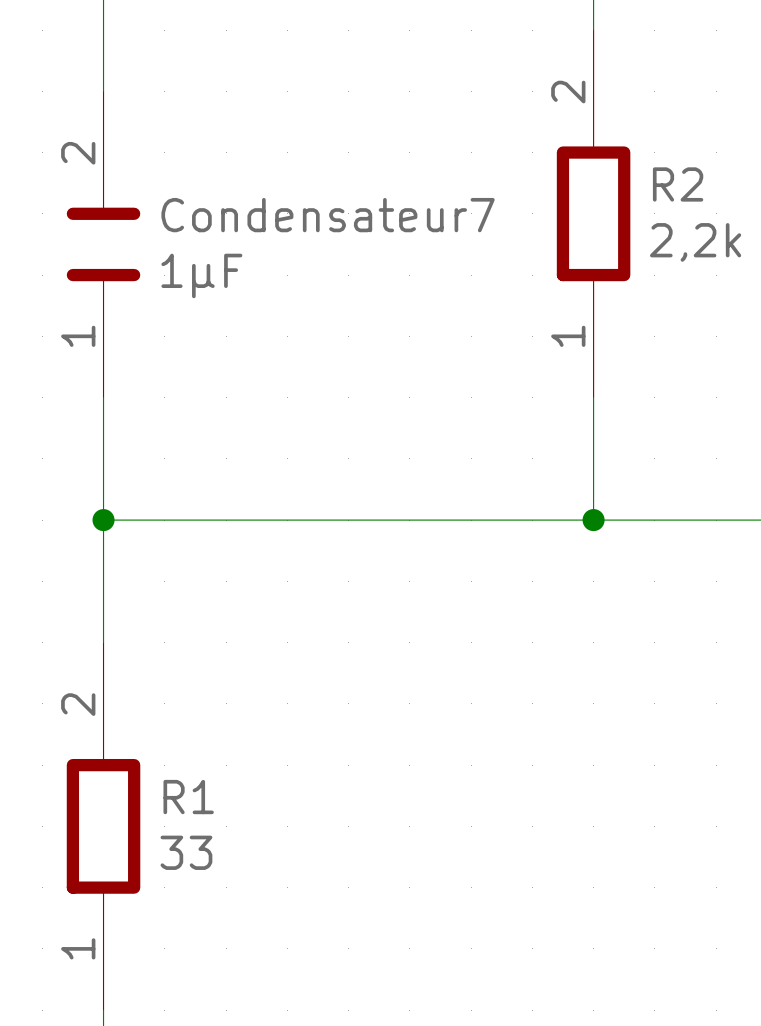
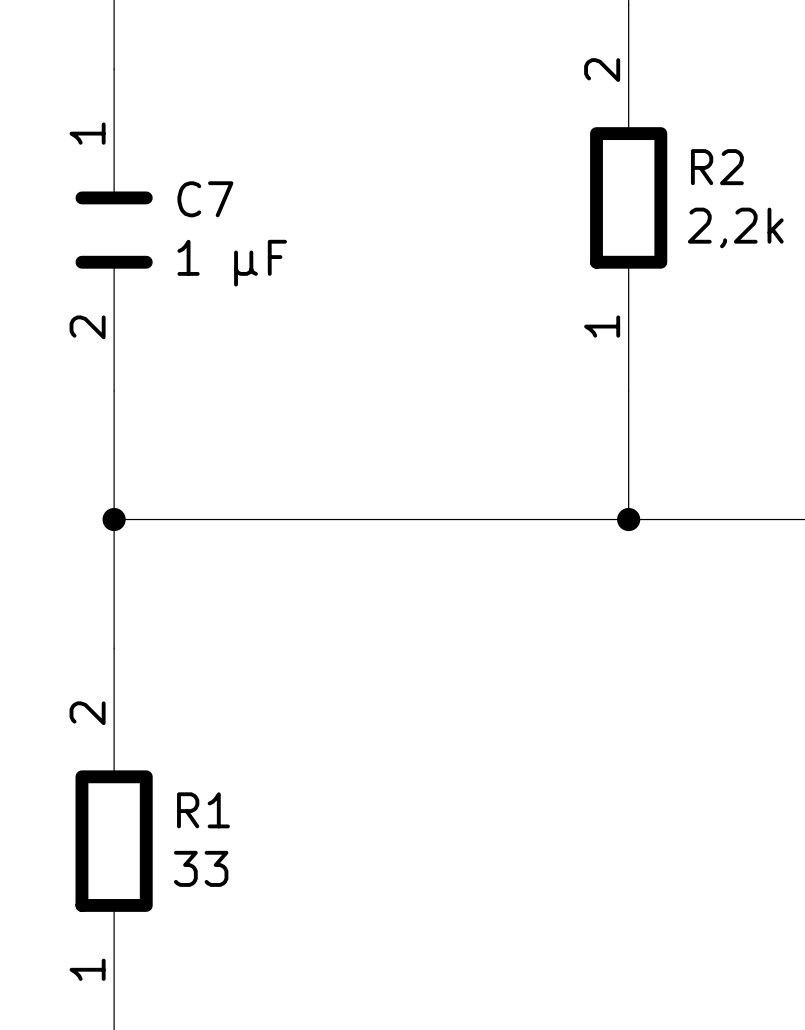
Condensateur7 name: Condensateur7 (328, 215) -> C7 (205, 199)
Condensateur7 rotation: 0° (103, 244) -> 180° (114, 230)
Condensateur7 value: 1µF (201, 275) -> 1 µF (232, 263)

